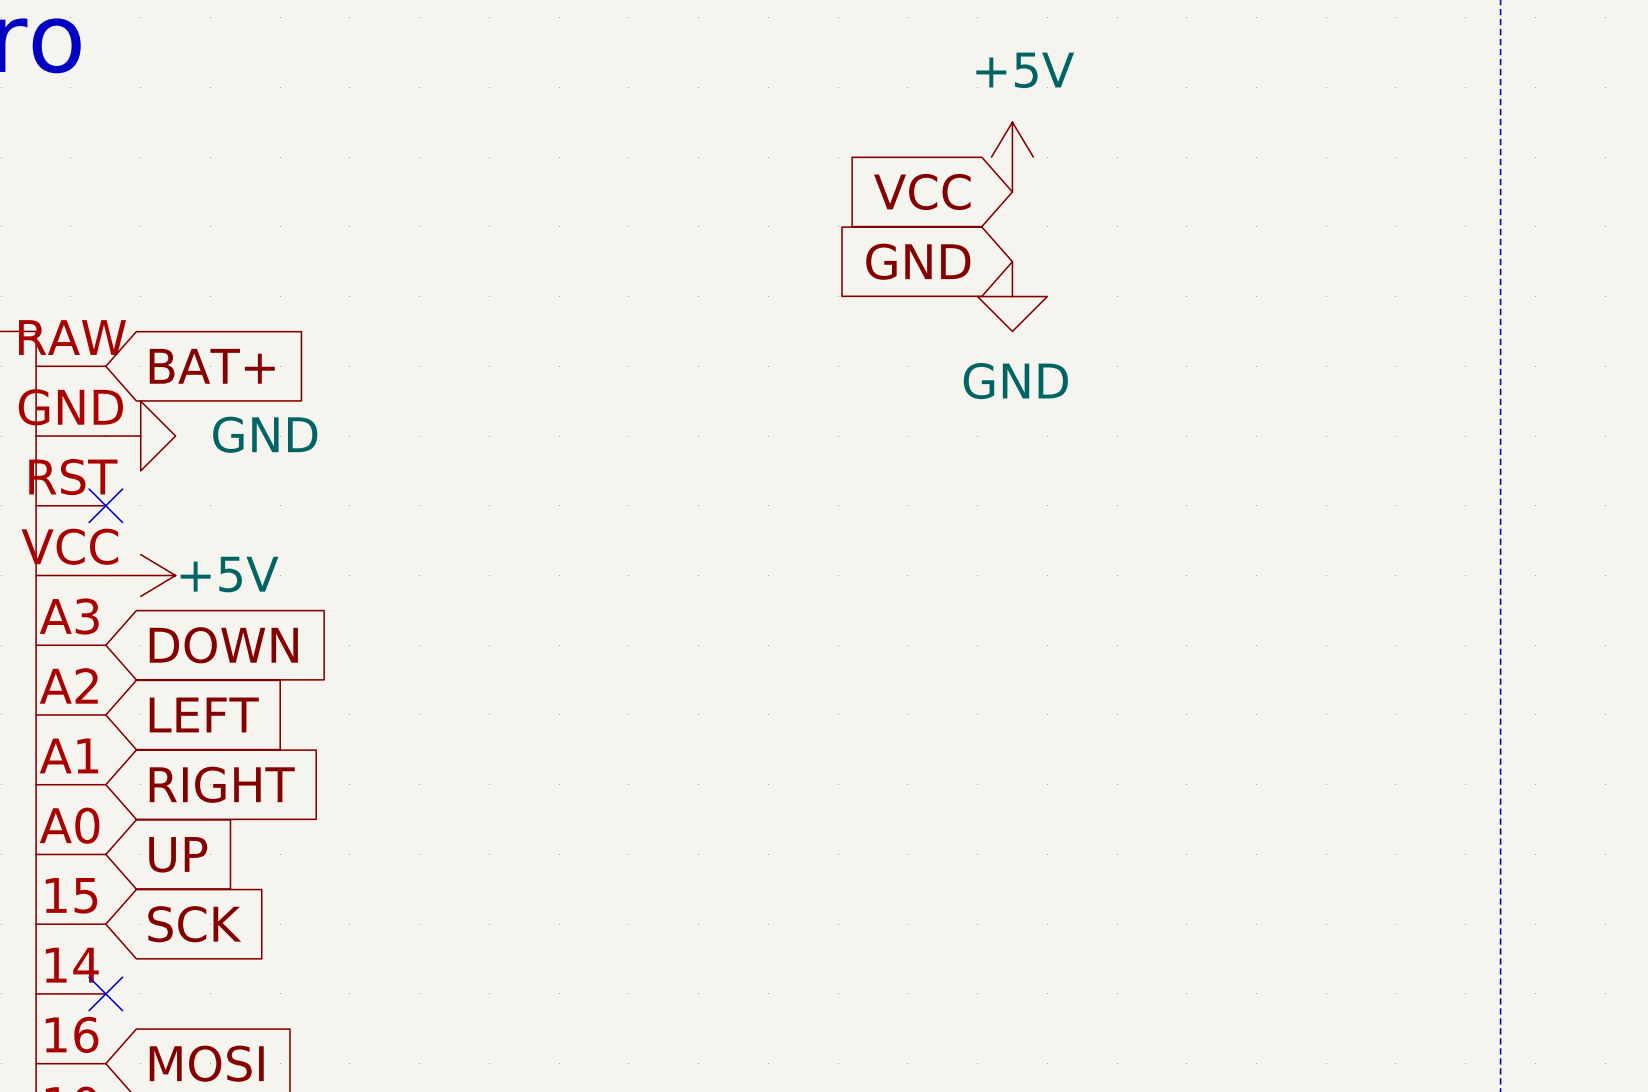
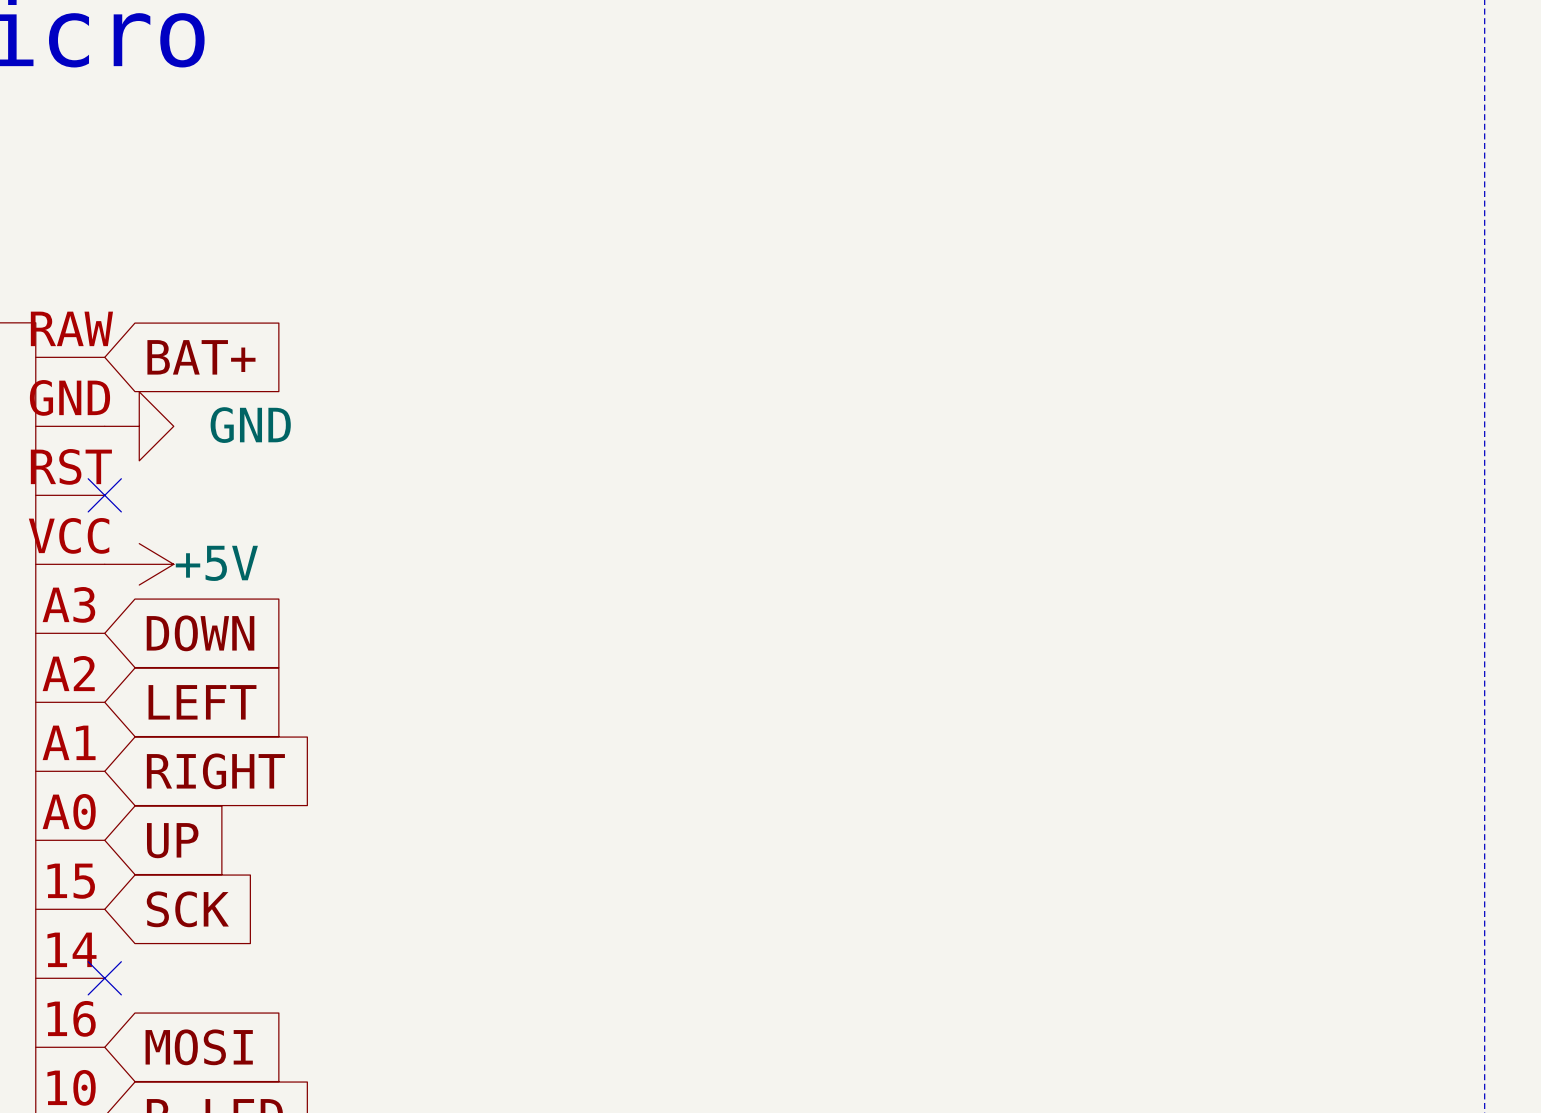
power symbol: +5V (1012, 157) -> none
global label: VCC (922, 191) -> none
global label: GND (918, 261) -> none
power symbol: GND (1012, 296) -> none

